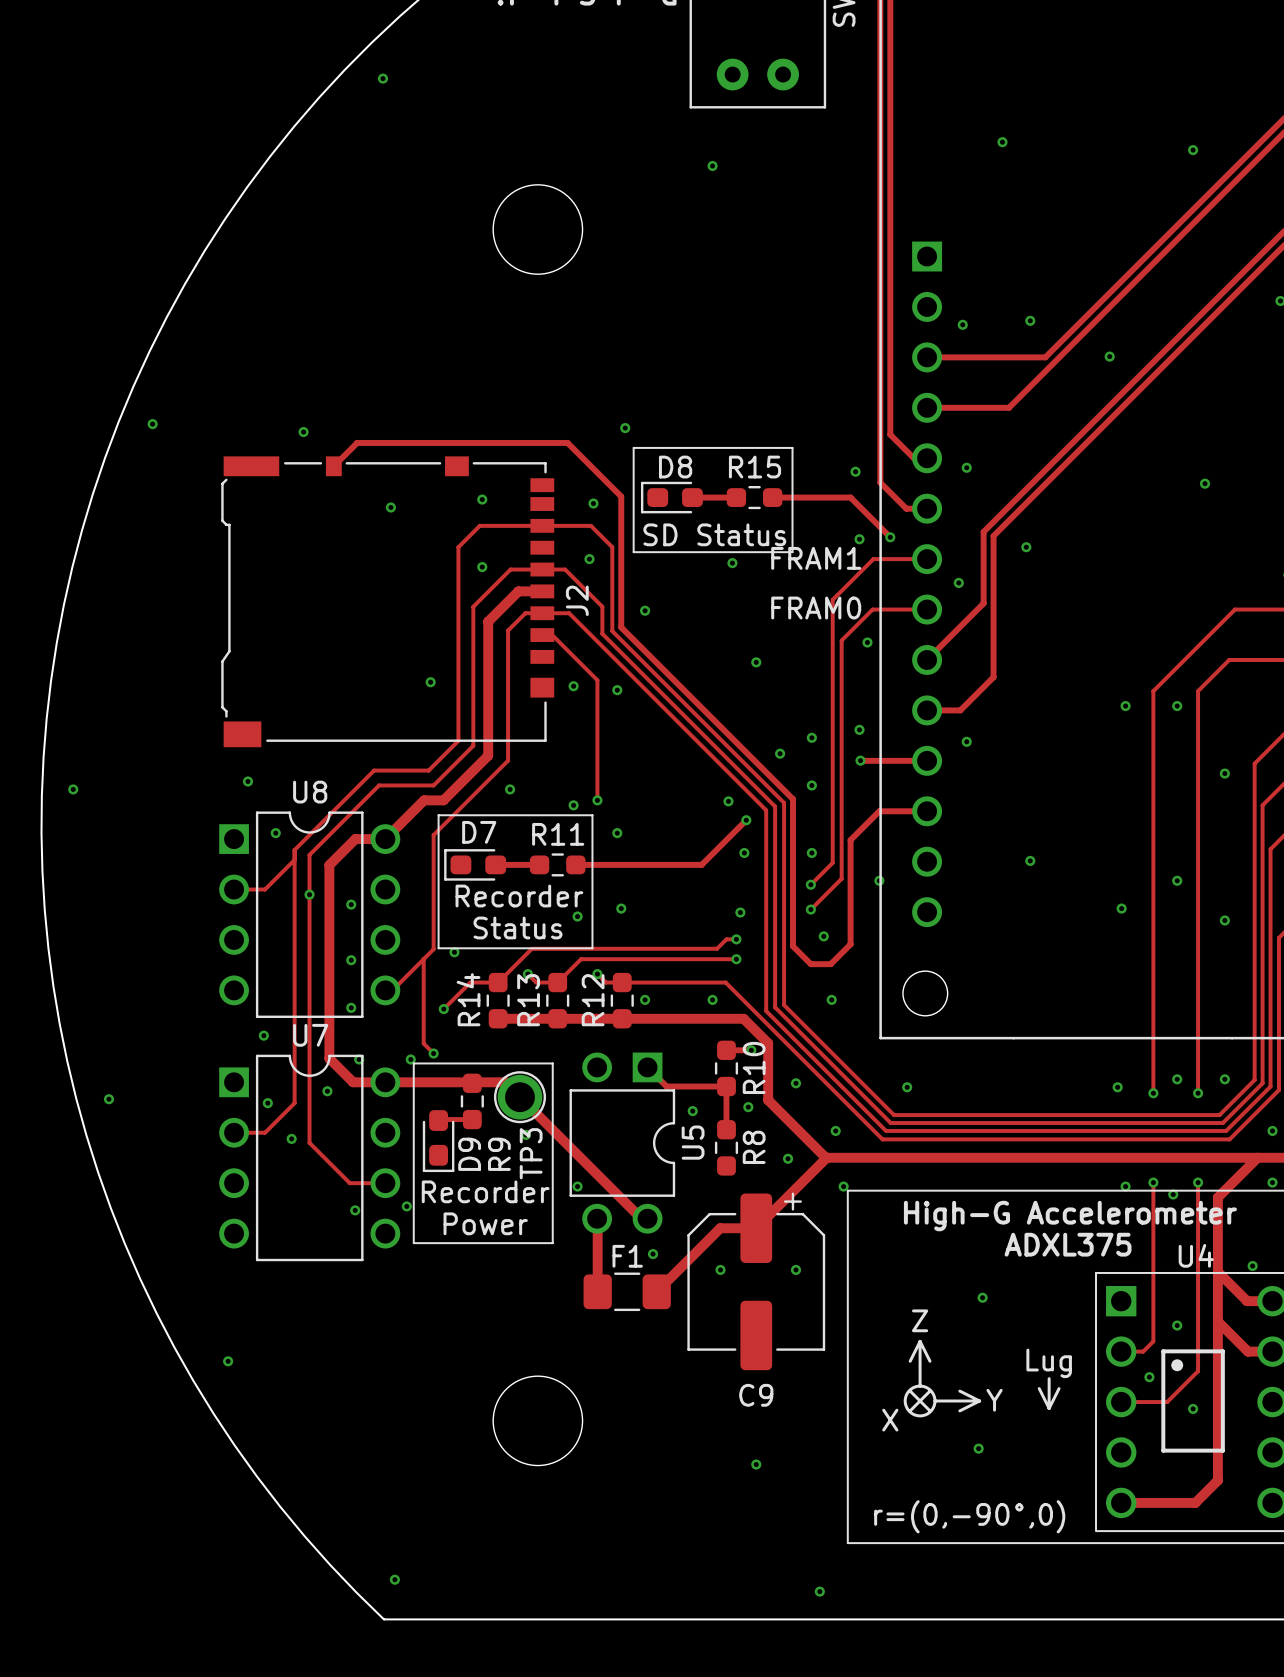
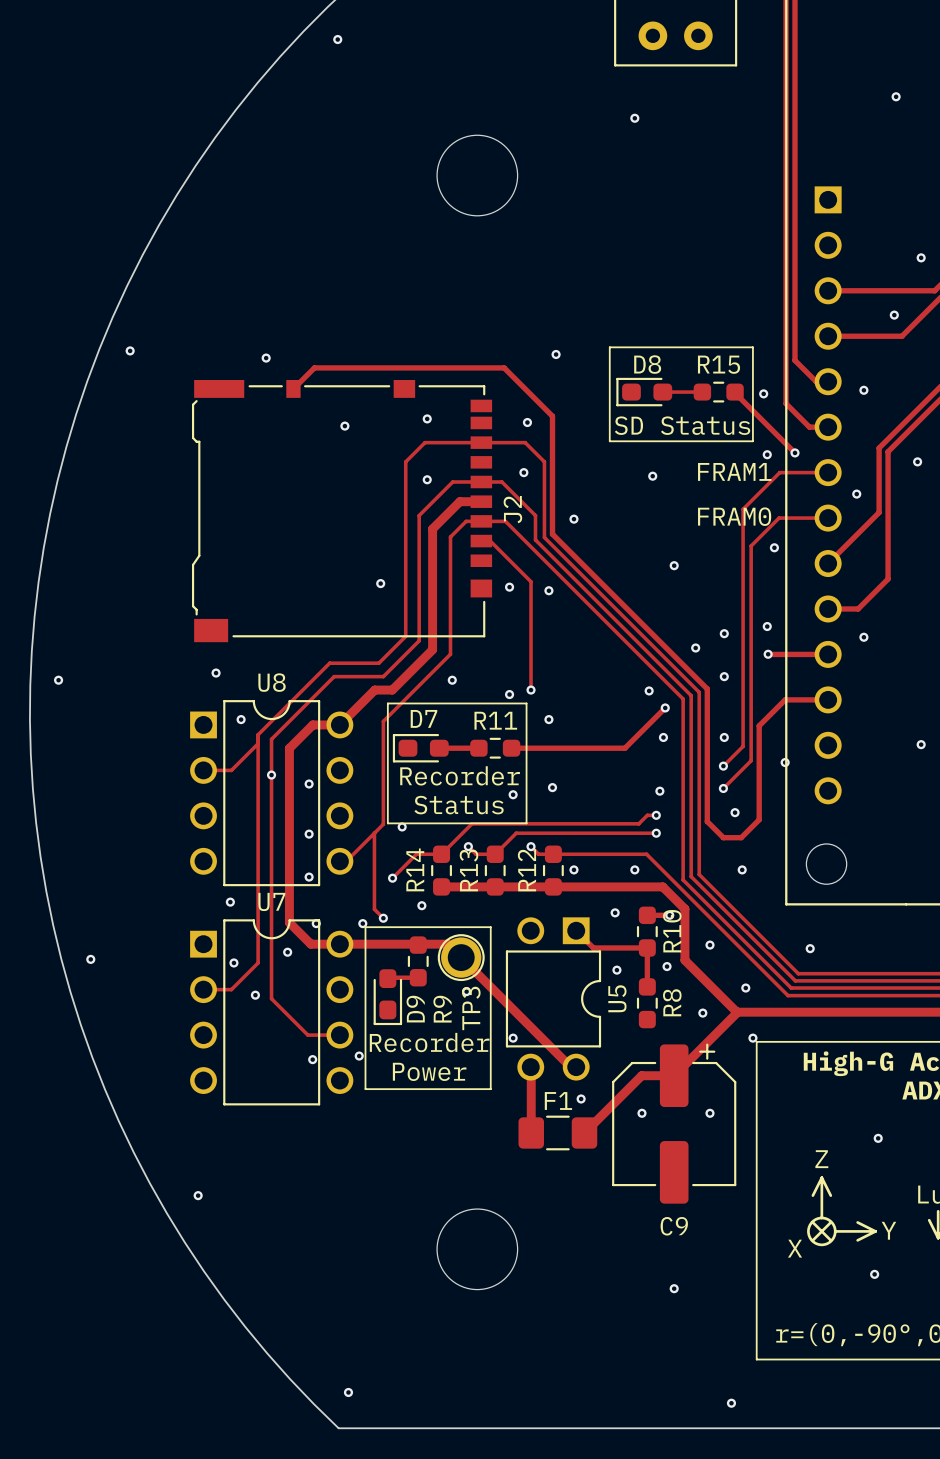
via position: (962, 324) -> (894, 315)
line: (633, 447) (792, 447) (792, 552) (633, 552) (633, 447) -> (609, 347) (752, 347) (752, 441) (609, 441) (609, 347)
D8 position: (671, 497) -> (644, 392)
track: (692, 497) (736, 497) -> (662, 392) (702, 392)
R15 position: (754, 497) -> (718, 392)
track: (772, 497) (850, 497) -> (735, 392) (759, 417)
text position: SD Status (714, 534) -> SD Status (682, 425)
via: none -> (421, 905)
via: none -> (615, 912)

